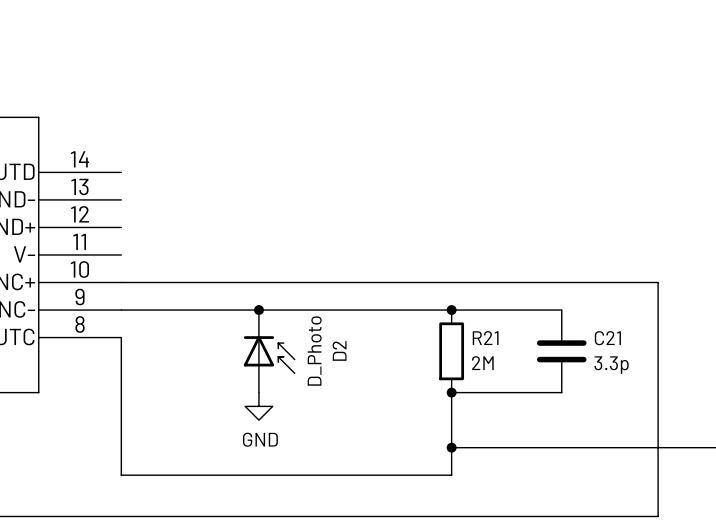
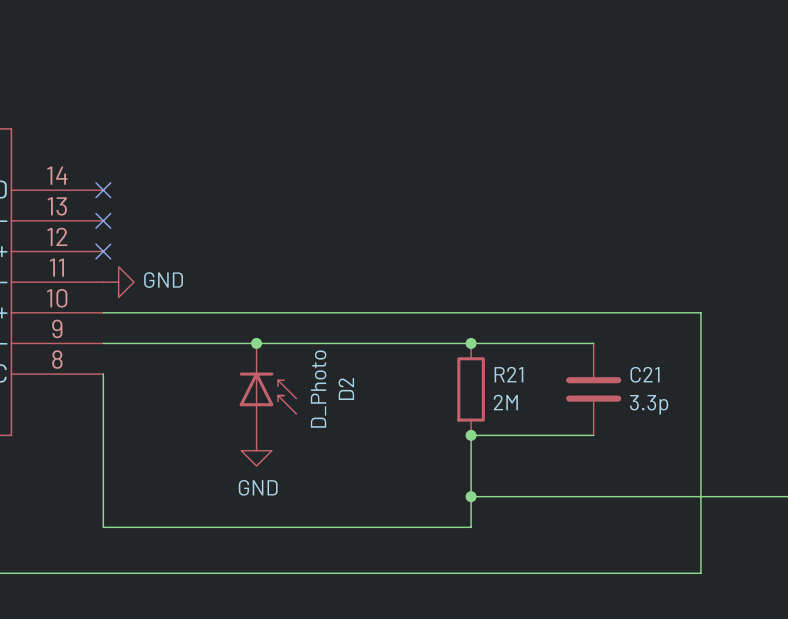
no-connect mark: none -> (103, 190)
no-connect mark: none -> (103, 220)
no-connect mark: none -> (103, 251)
power symbol: none -> GND (118, 282)

